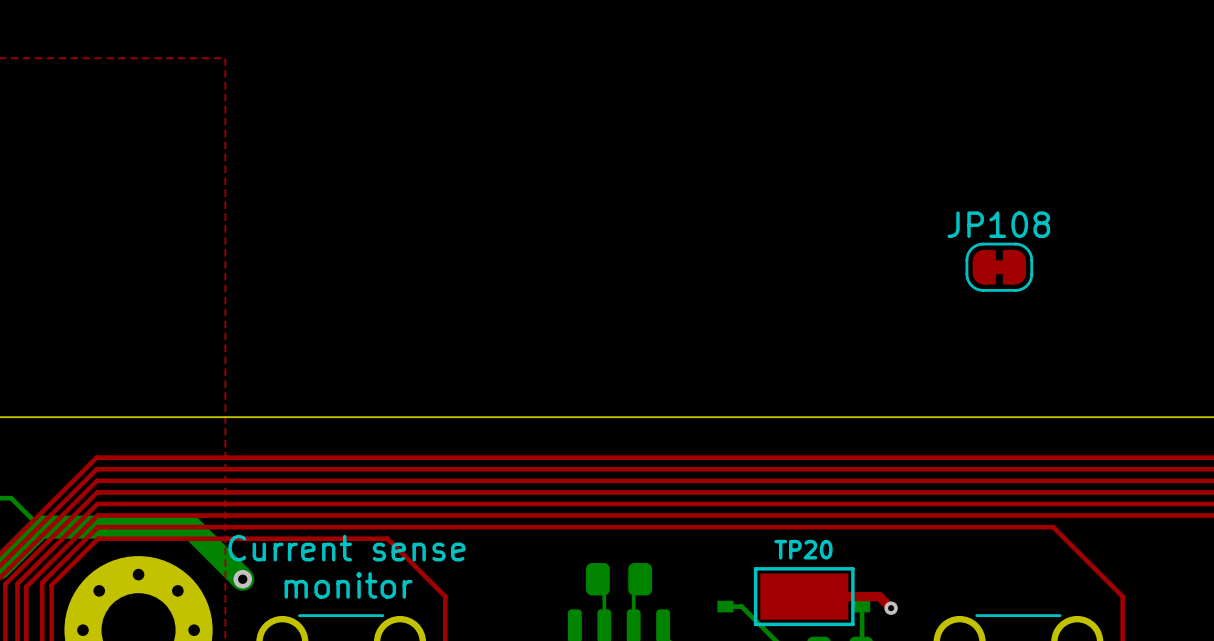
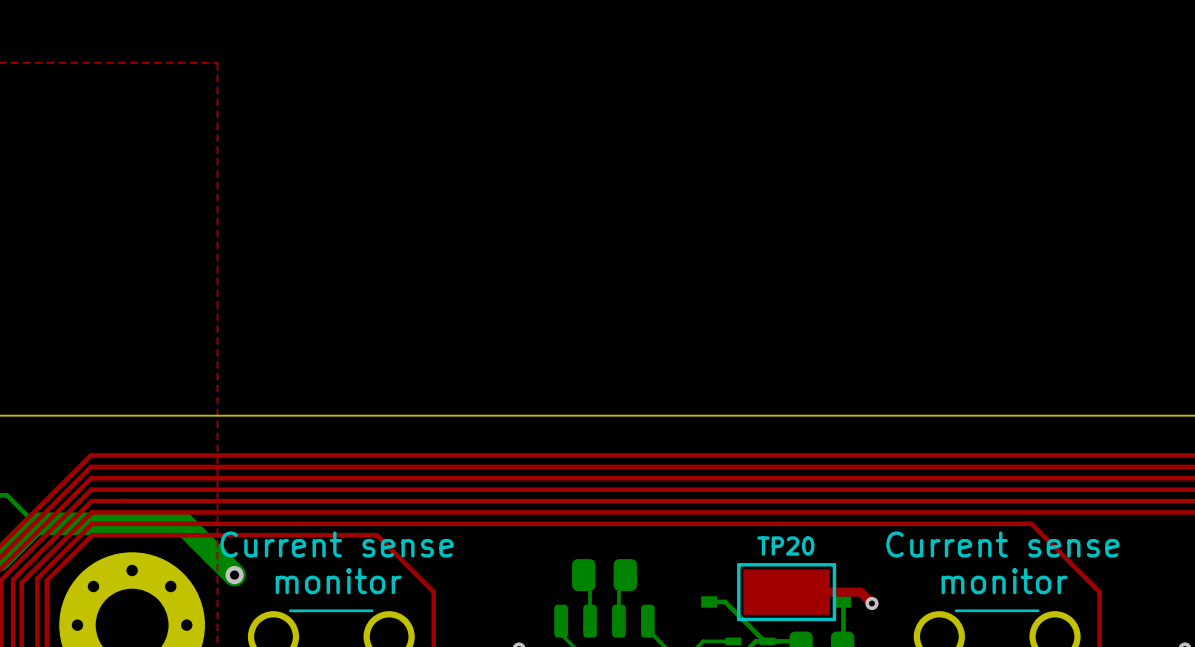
JP108: (999, 267) -> none
text: none -> Current sense (1002, 544)
text: none -> monitor (1004, 581)

